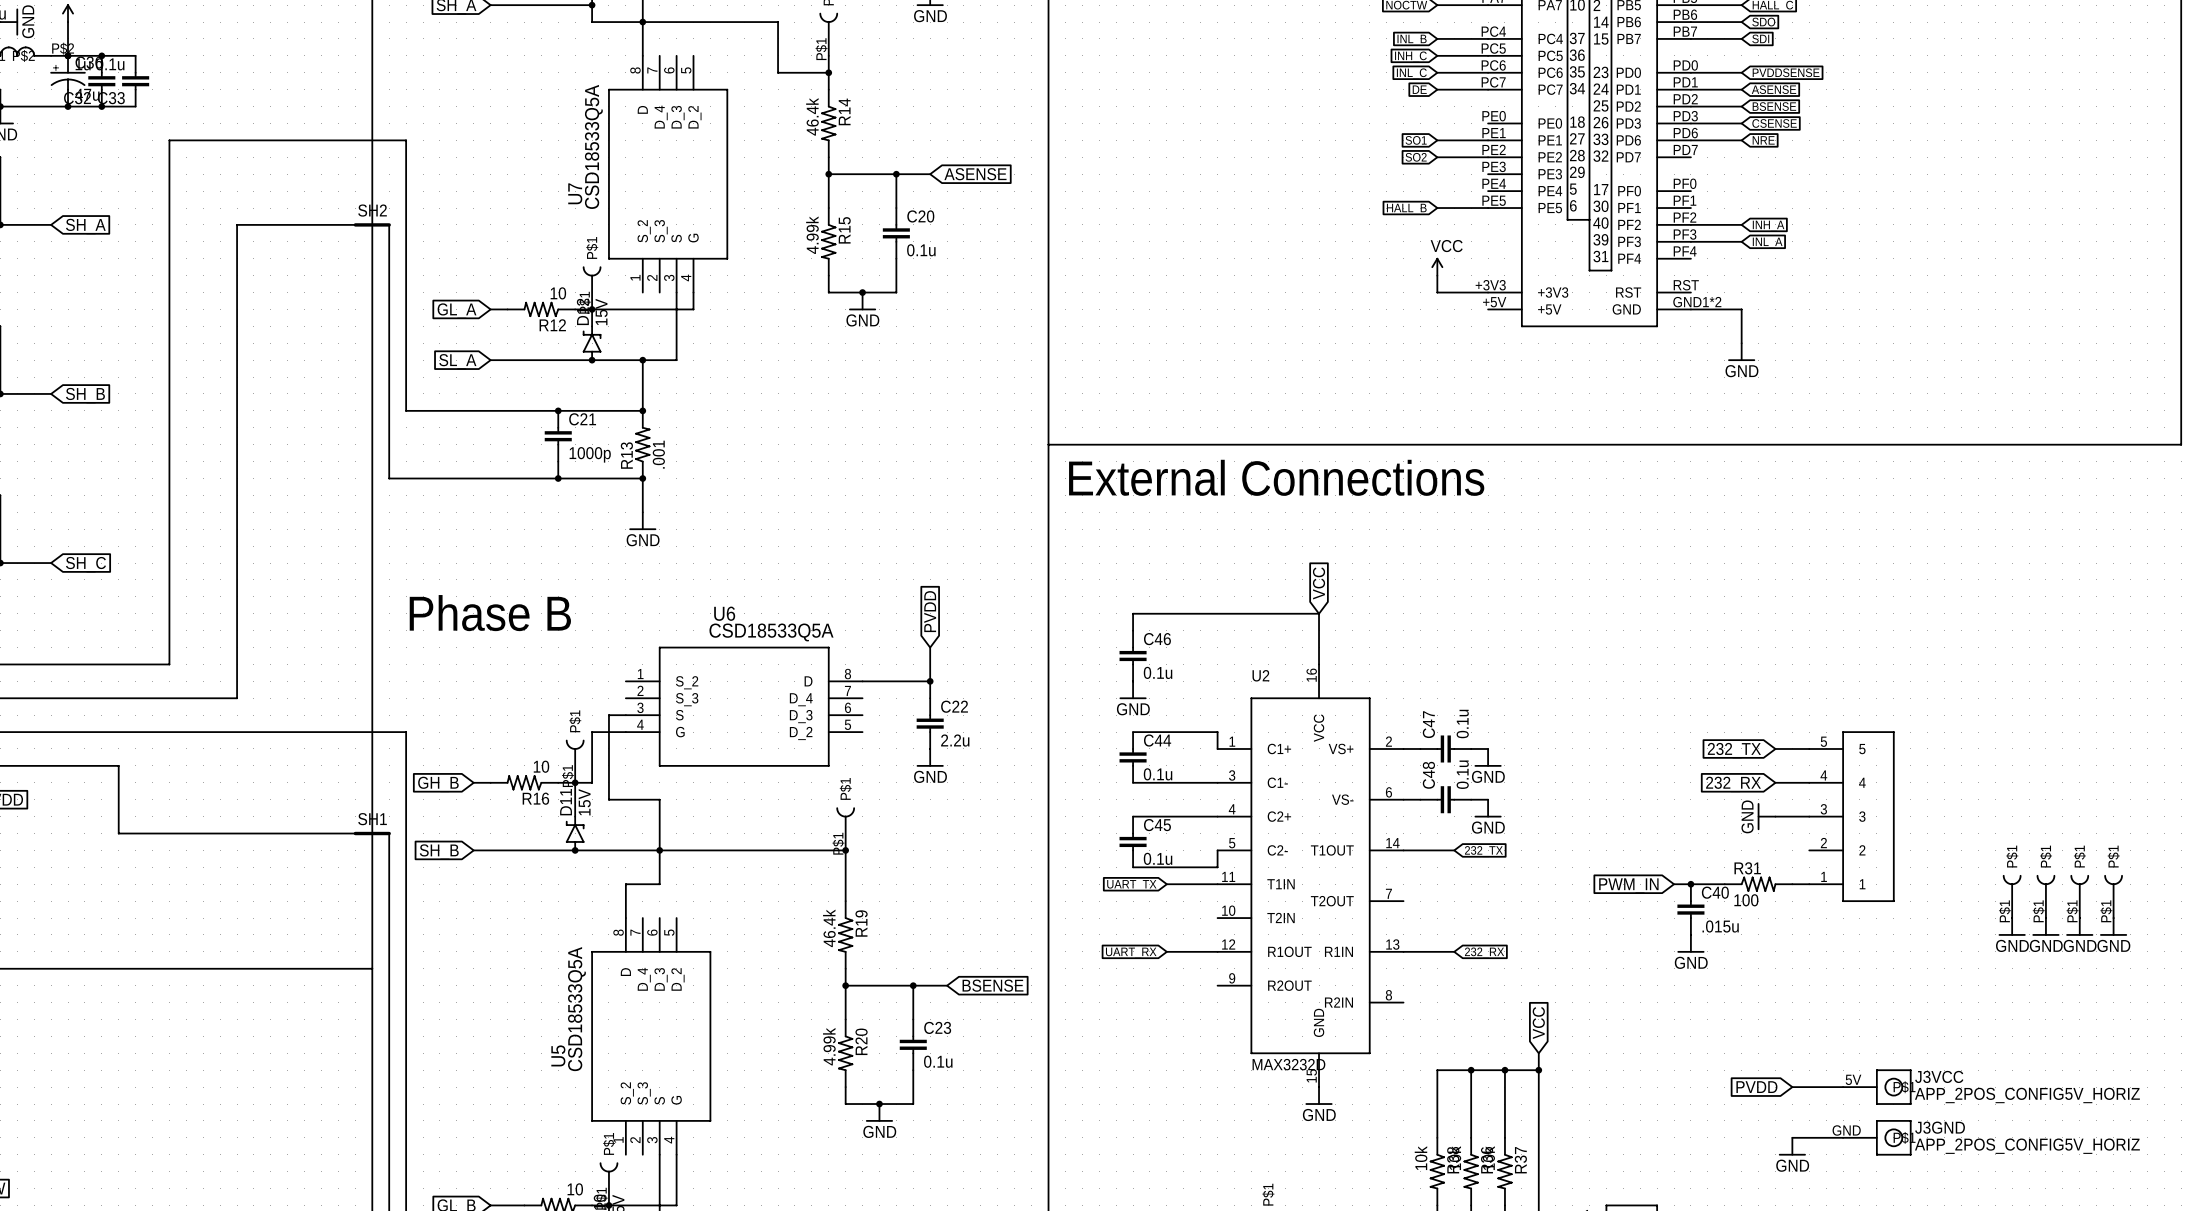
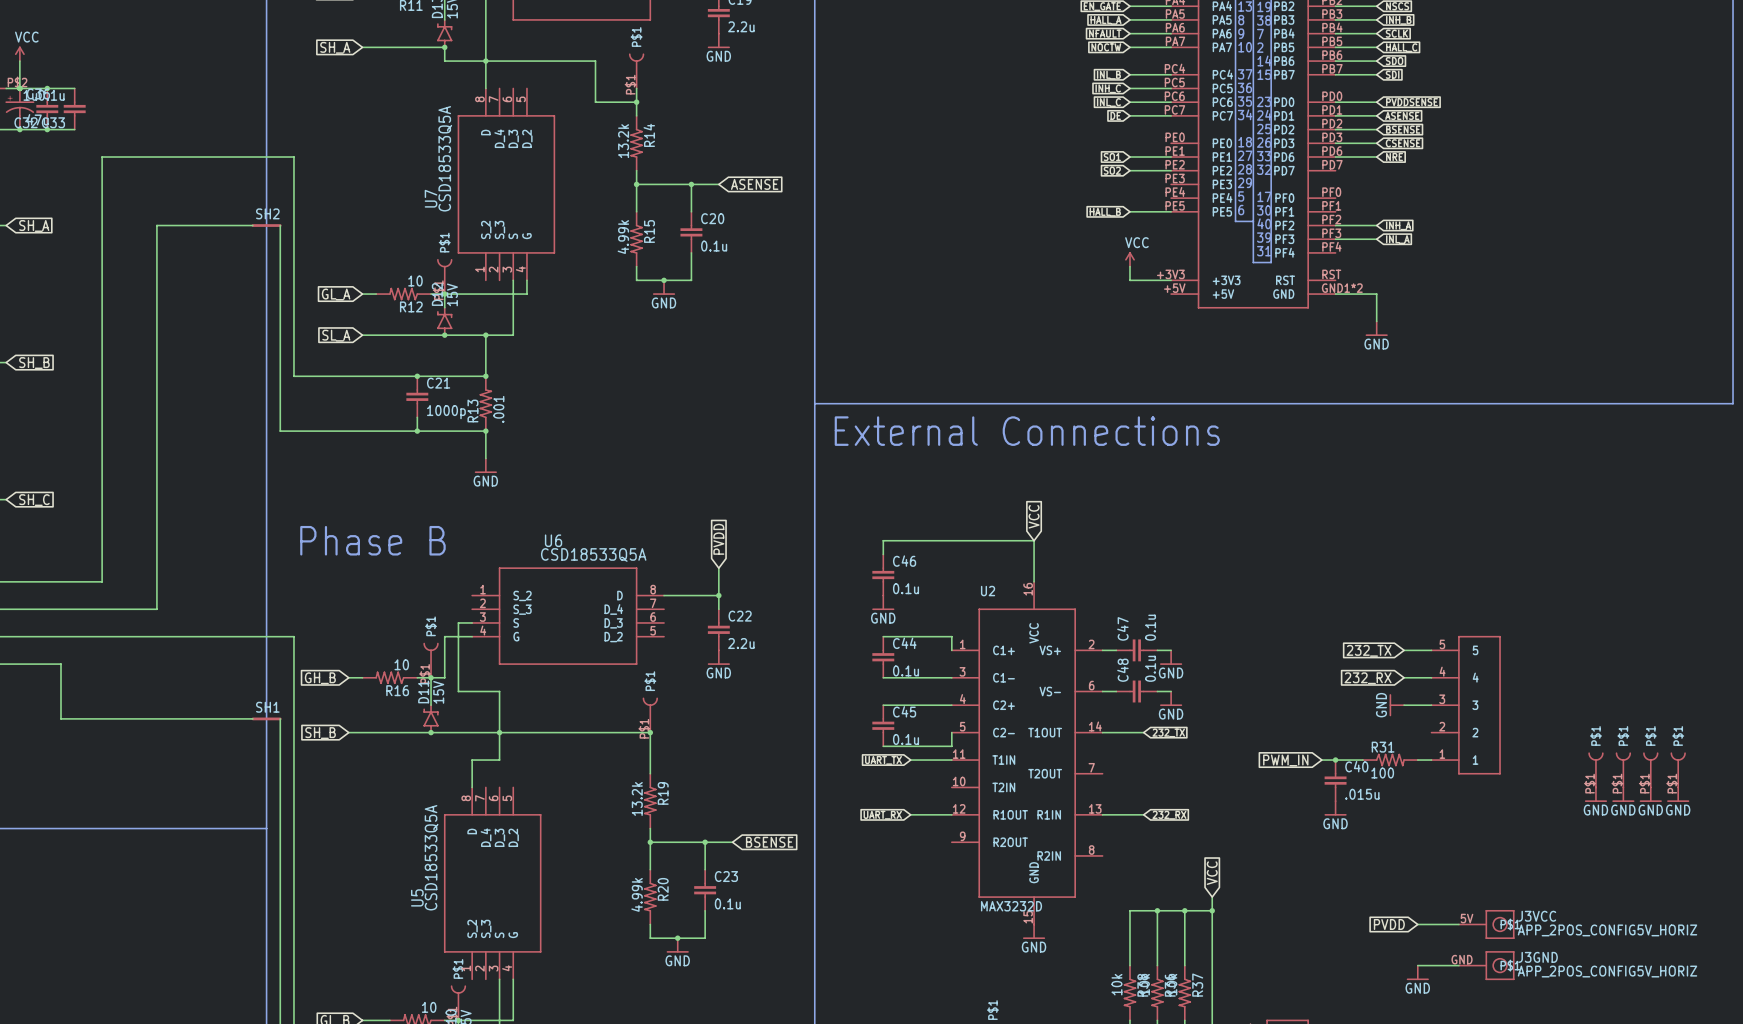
R14 value: 46.4k (812, 116) -> 13.2k (623, 141)
R19 value: 46.4k (829, 928) -> 13.2k (637, 798)

